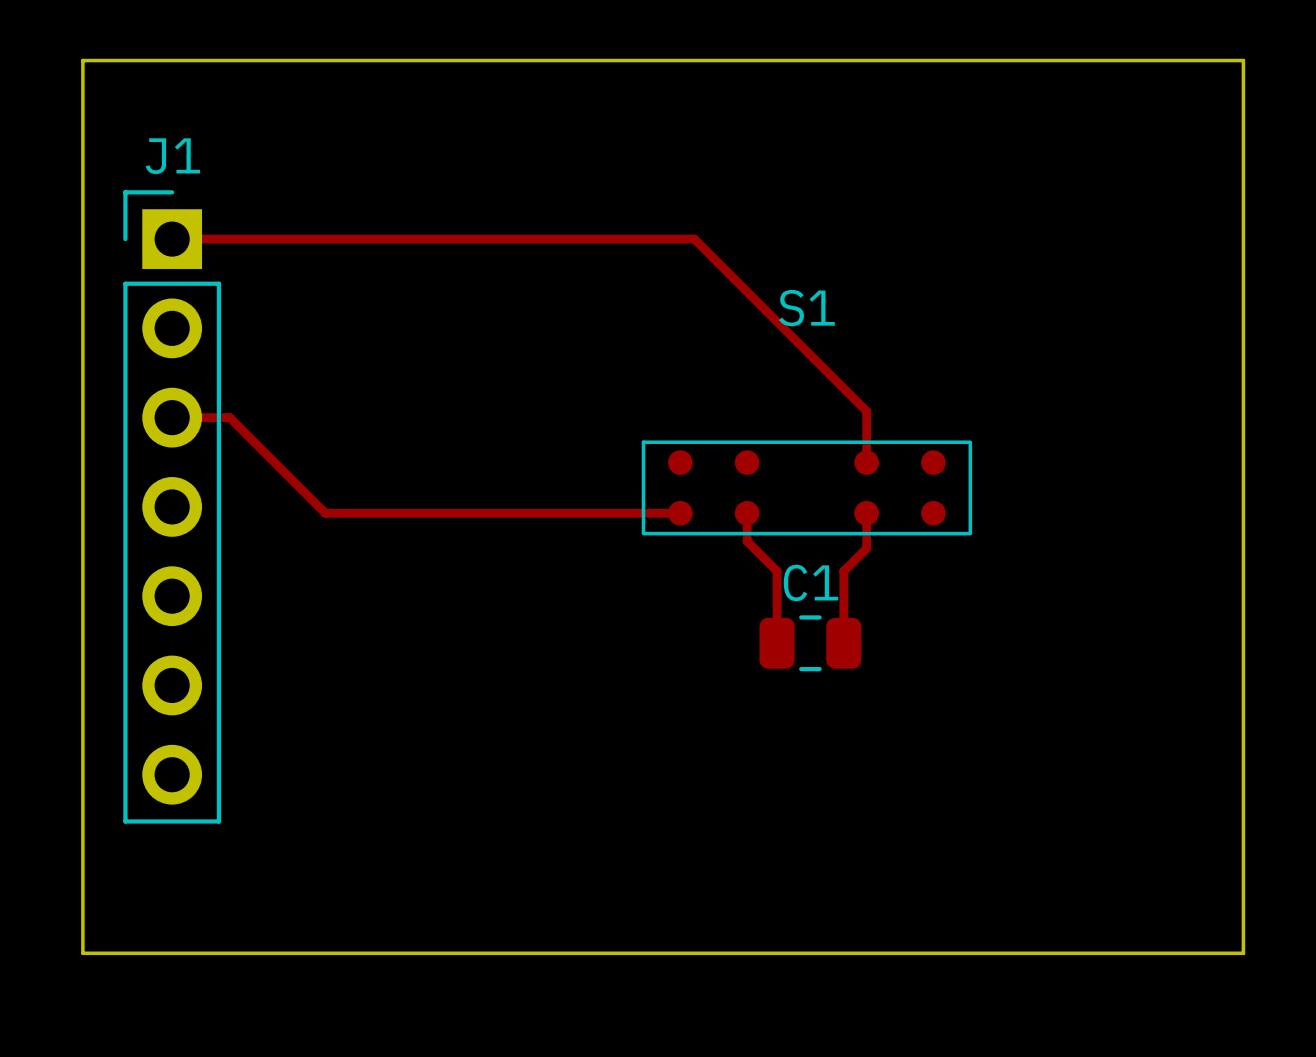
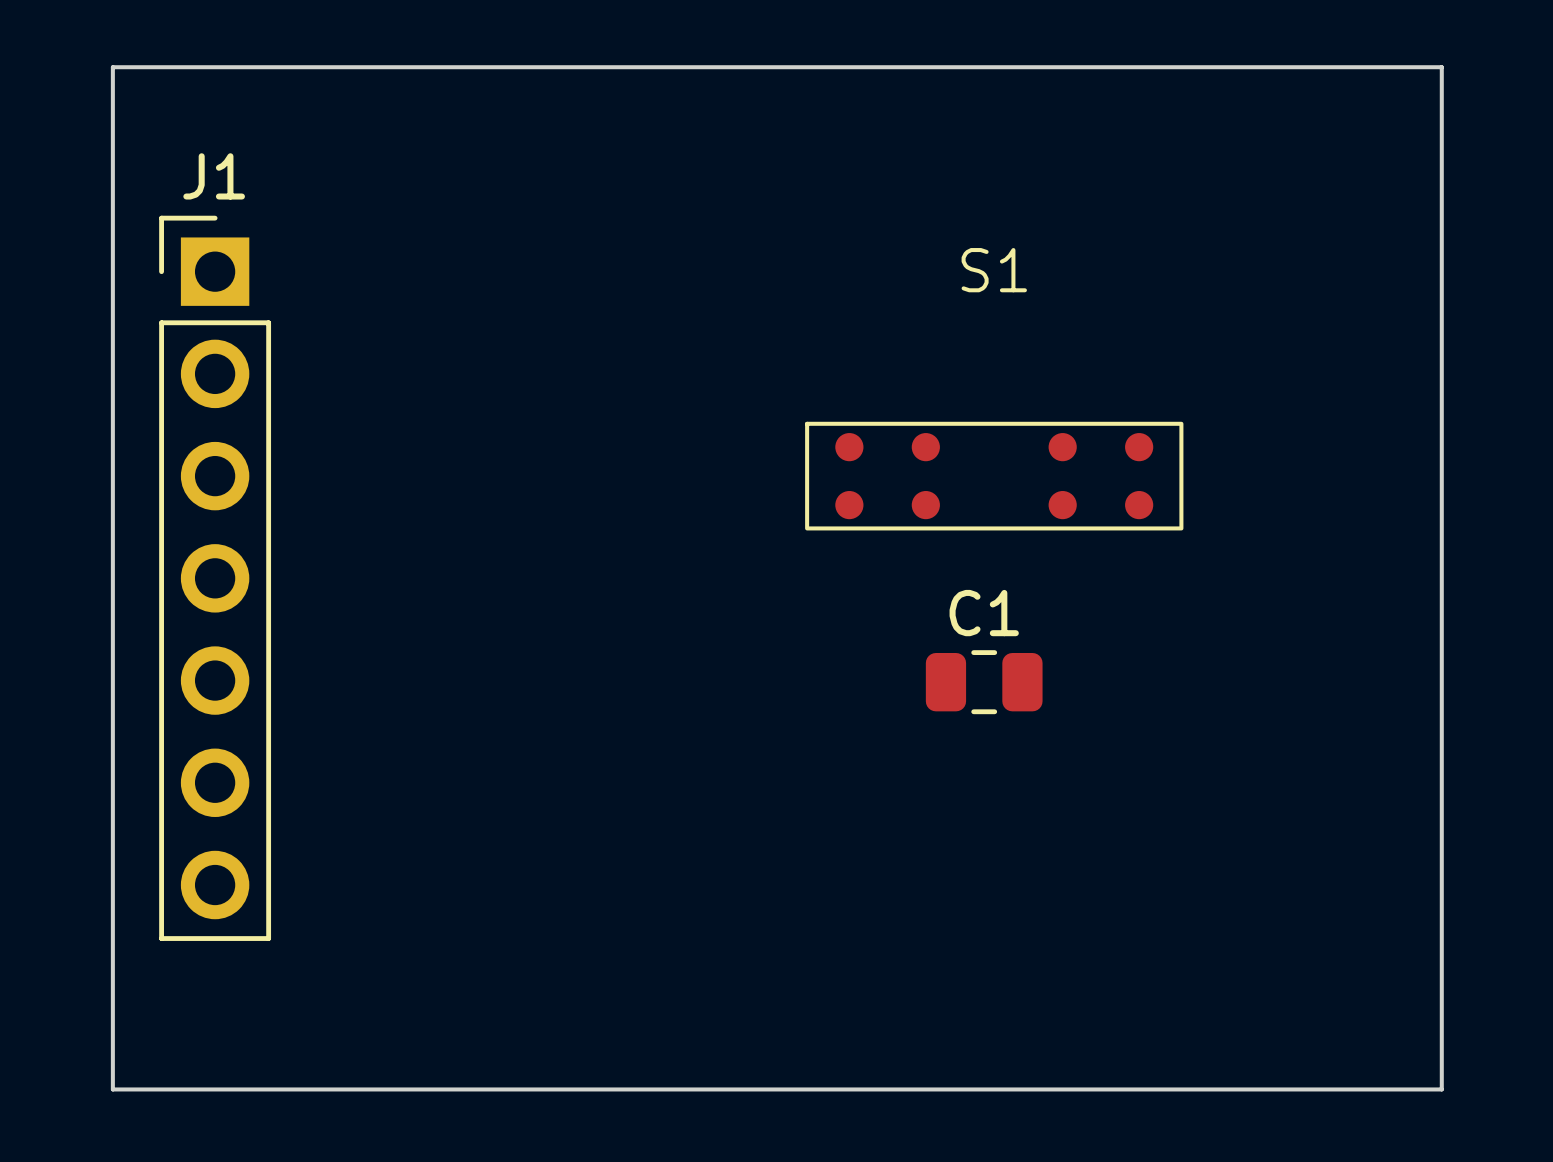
track: (172, 239) (694, 239) (866, 411) (866, 462) -> none
track: (172, 417) (229, 417) (325, 513) (680, 513) -> none
S1 position: (806, 487) -> (994, 476)
track: (747, 513) (747, 541) (777, 571) (777, 643) -> none
track: (866, 513) (866, 548) (843, 571) (843, 643) -> none
C1 position: (810, 643) -> (984, 682)

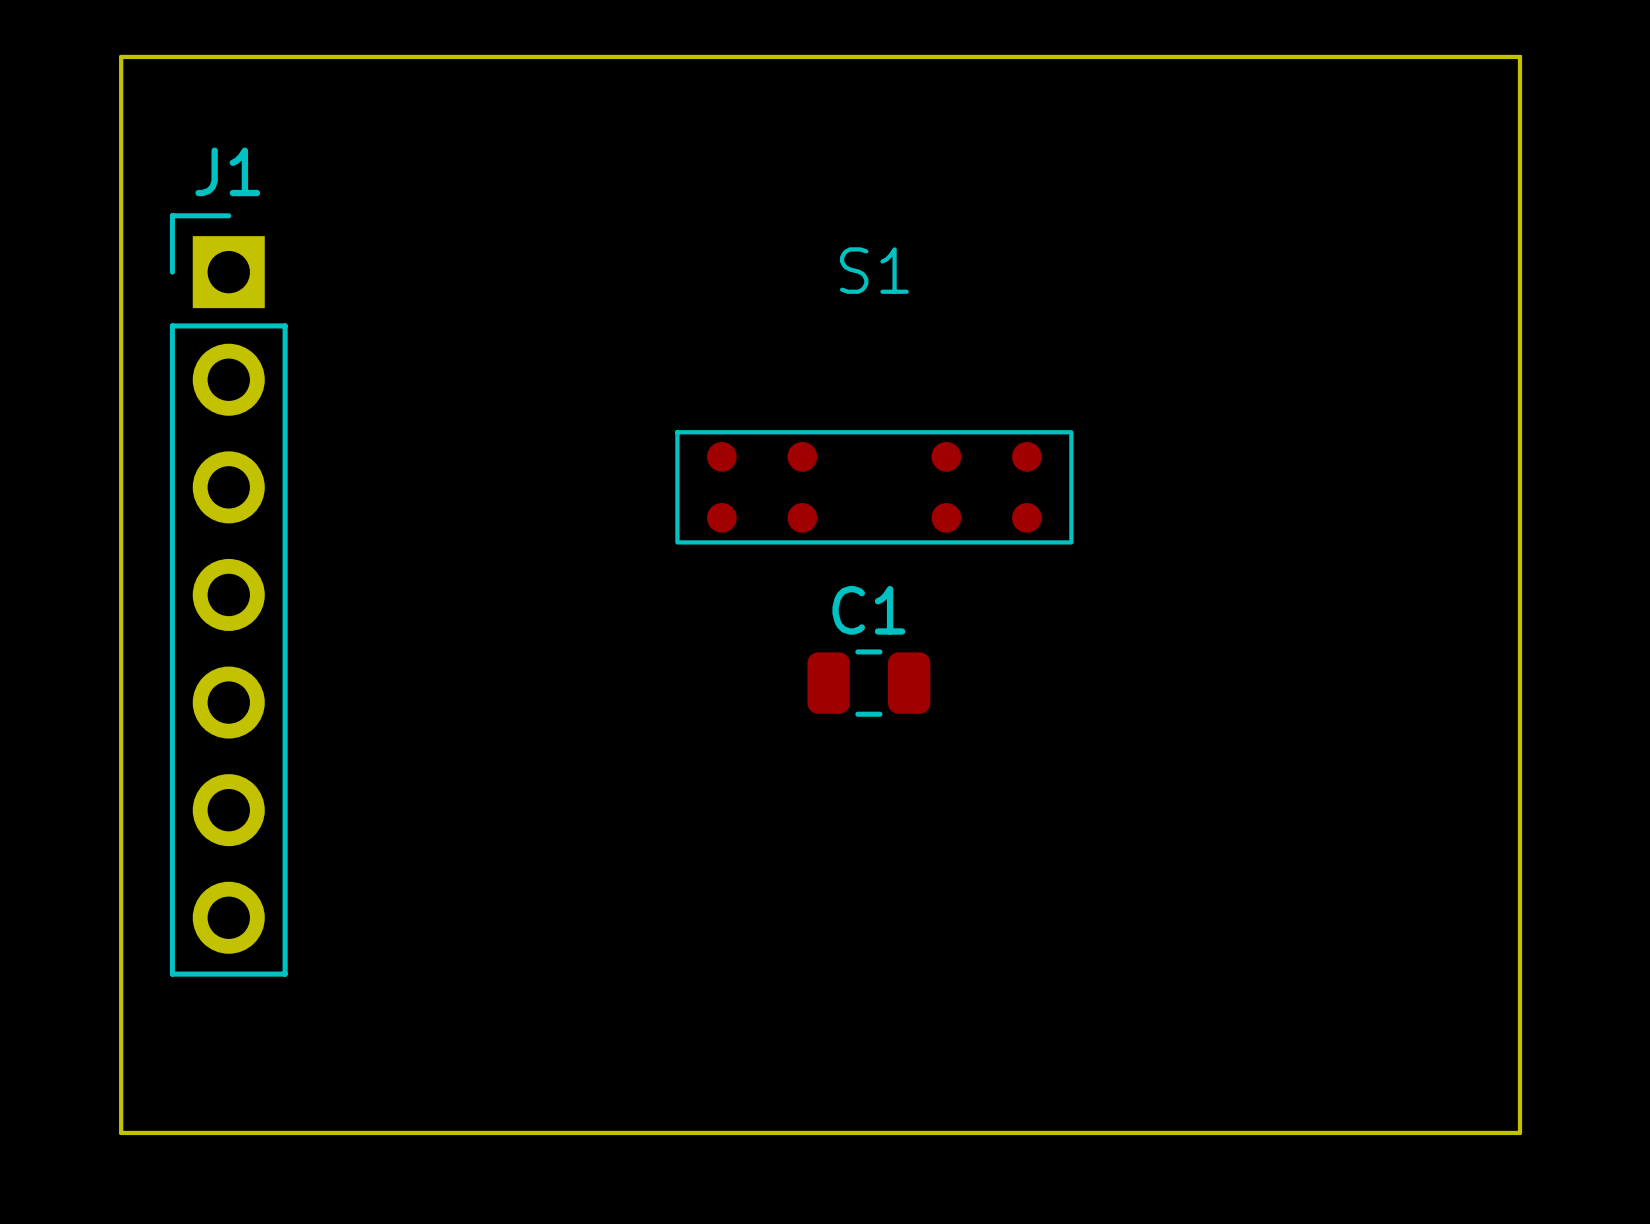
S1 position: (994, 476) -> (874, 487)
C1 position: (984, 682) -> (868, 683)

